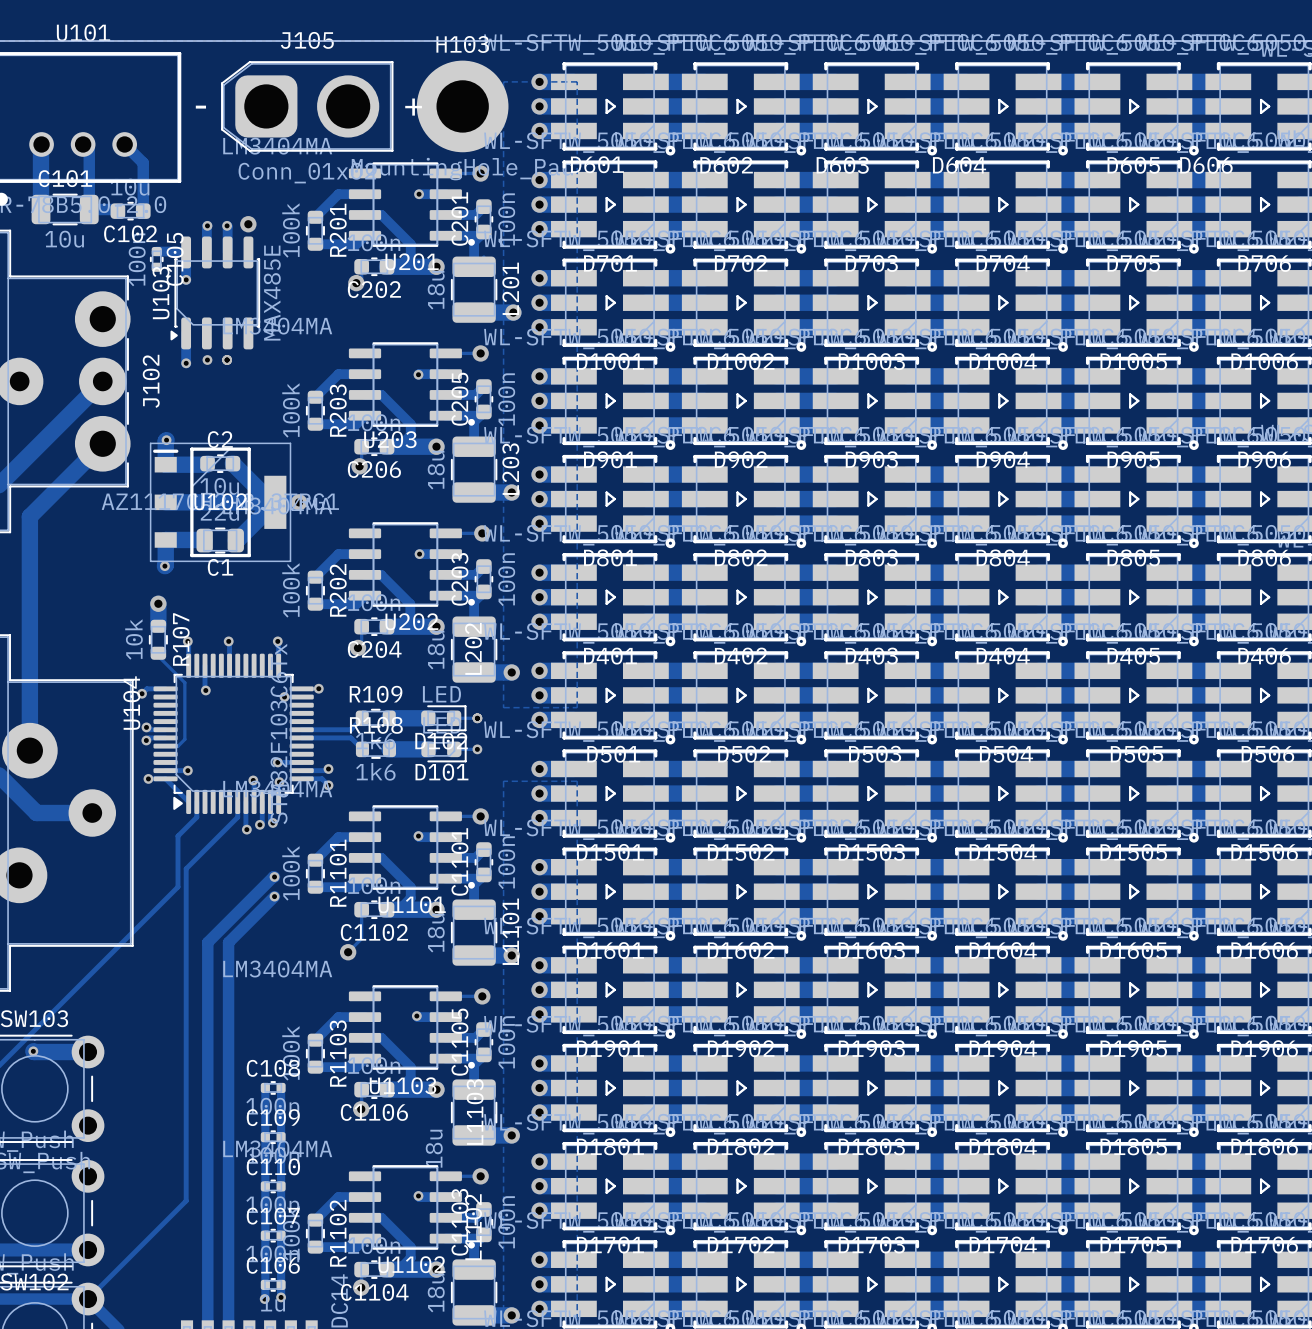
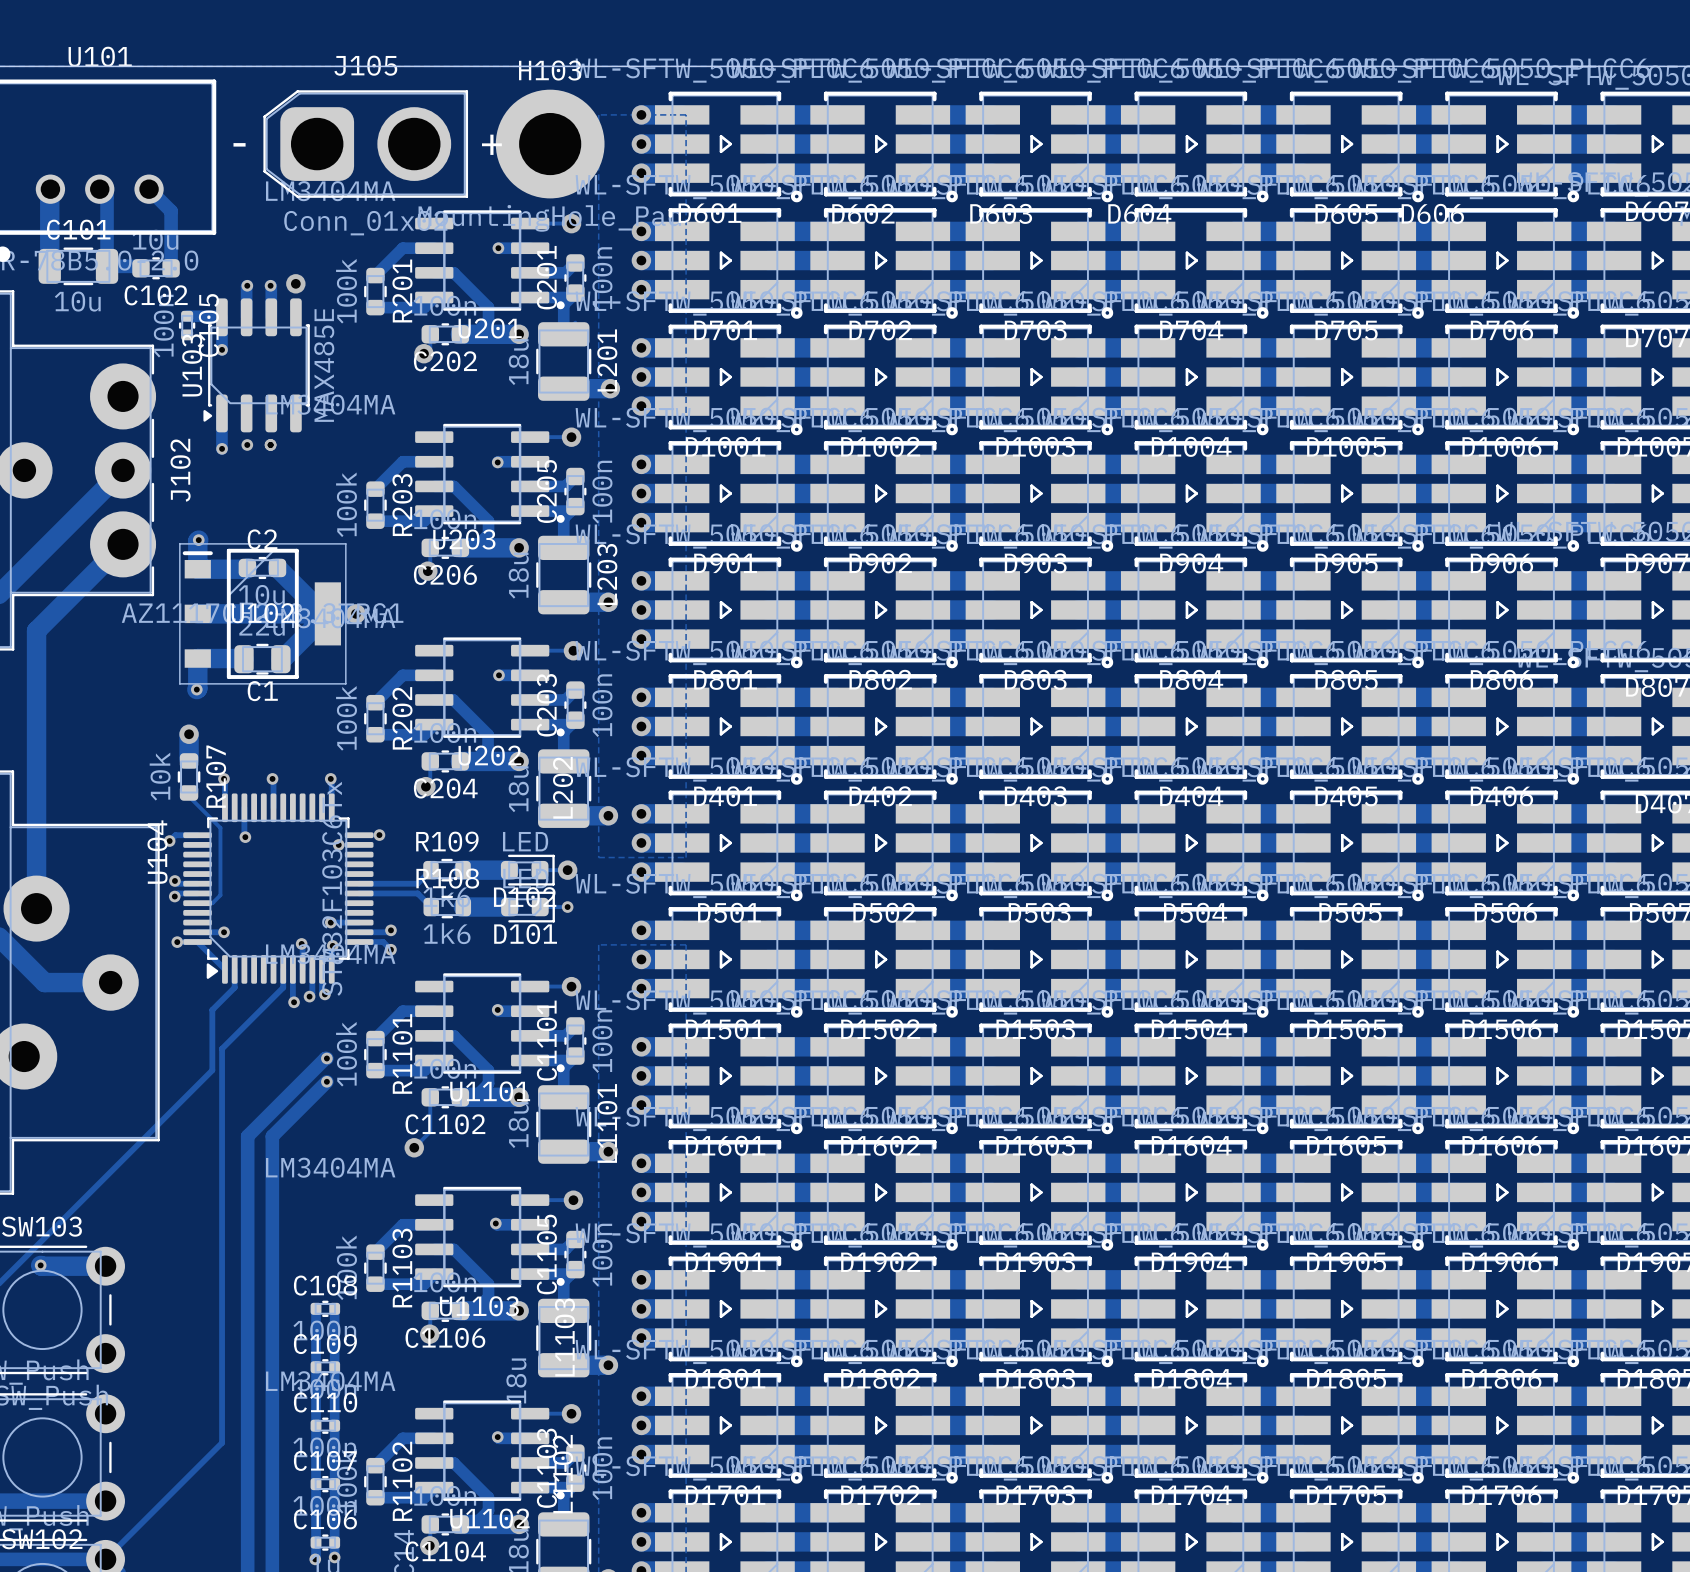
via: none -> (567, 870)

